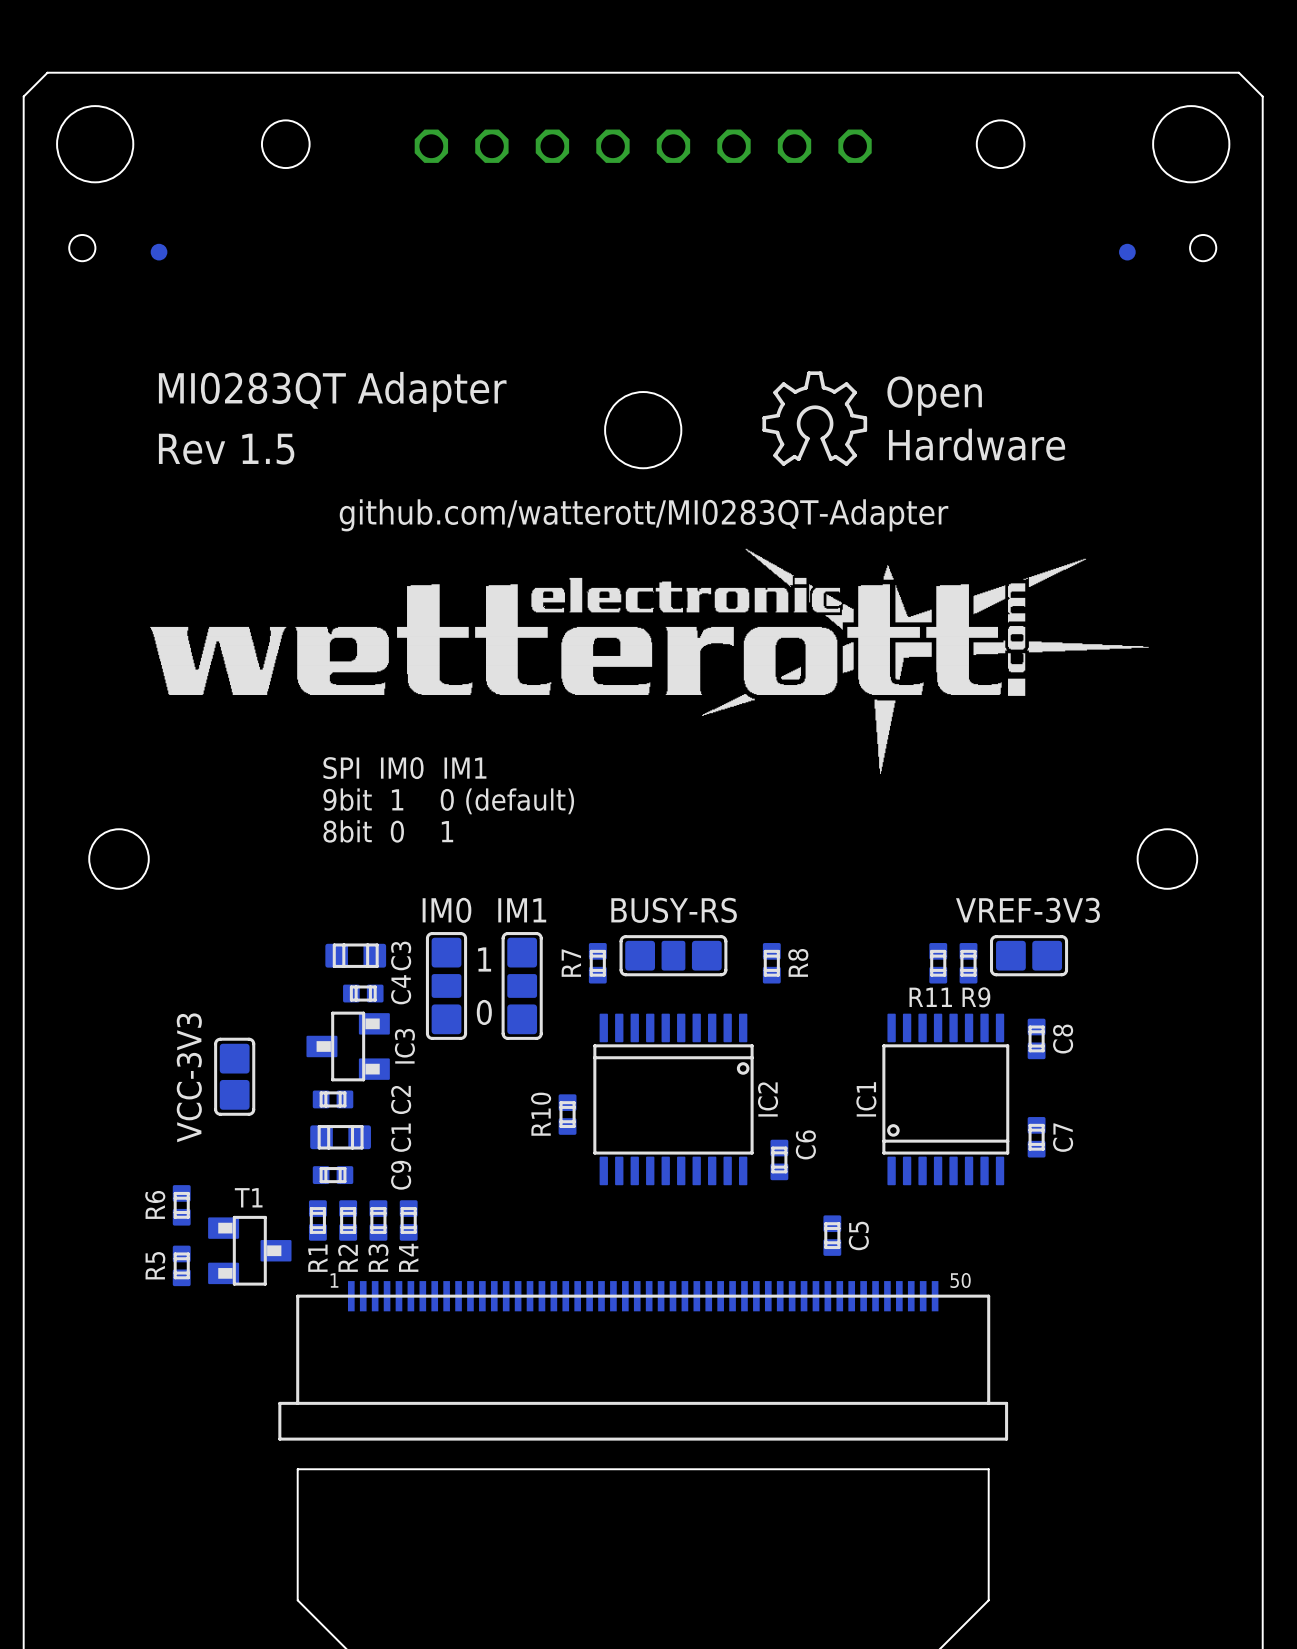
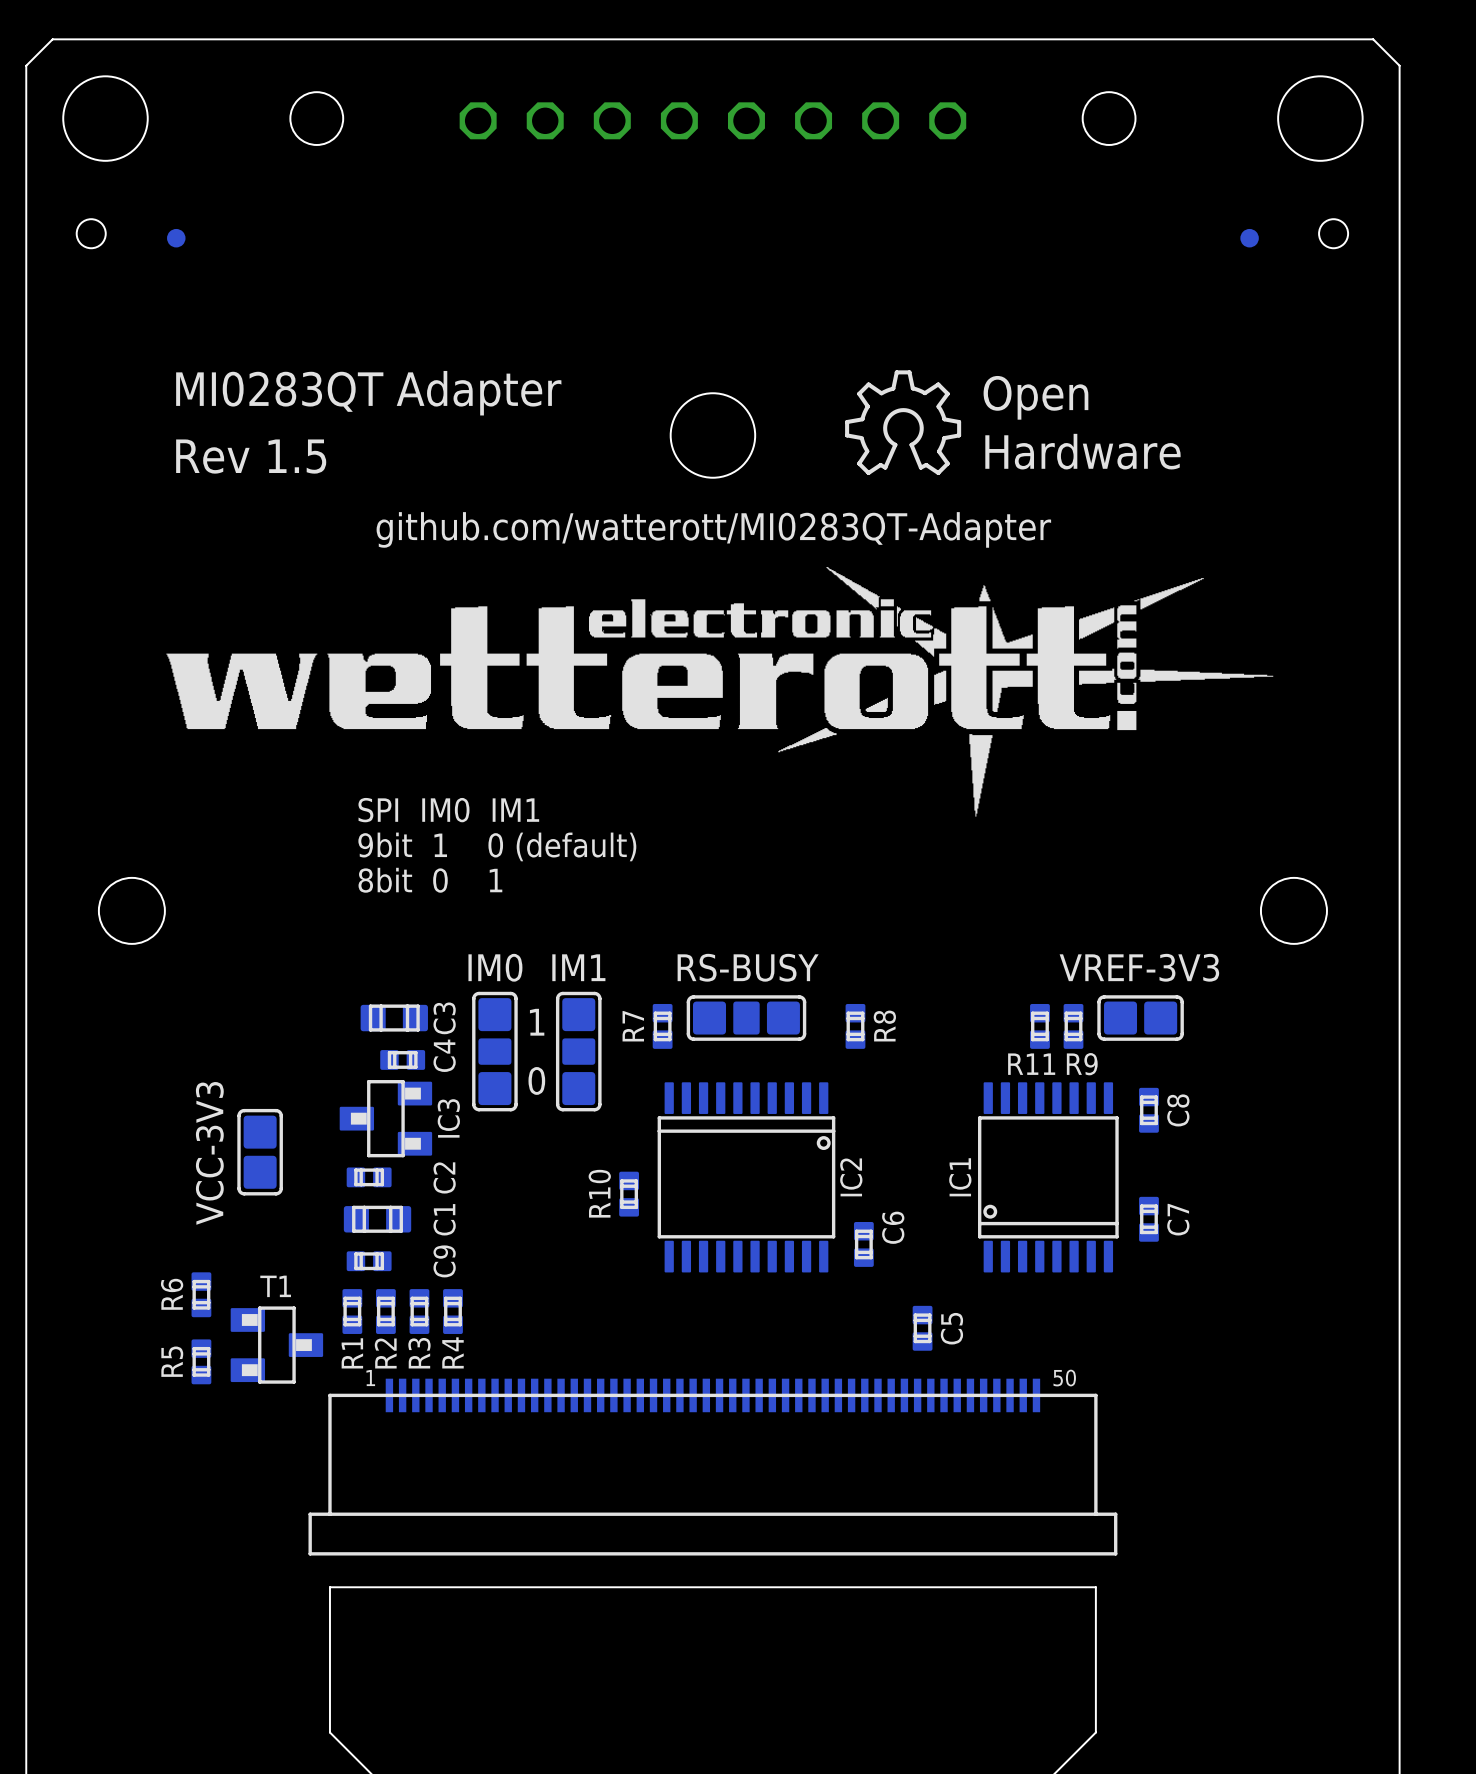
BUSY-RS name: BUSY-RS (674, 910) -> RS-BUSY (748, 967)

